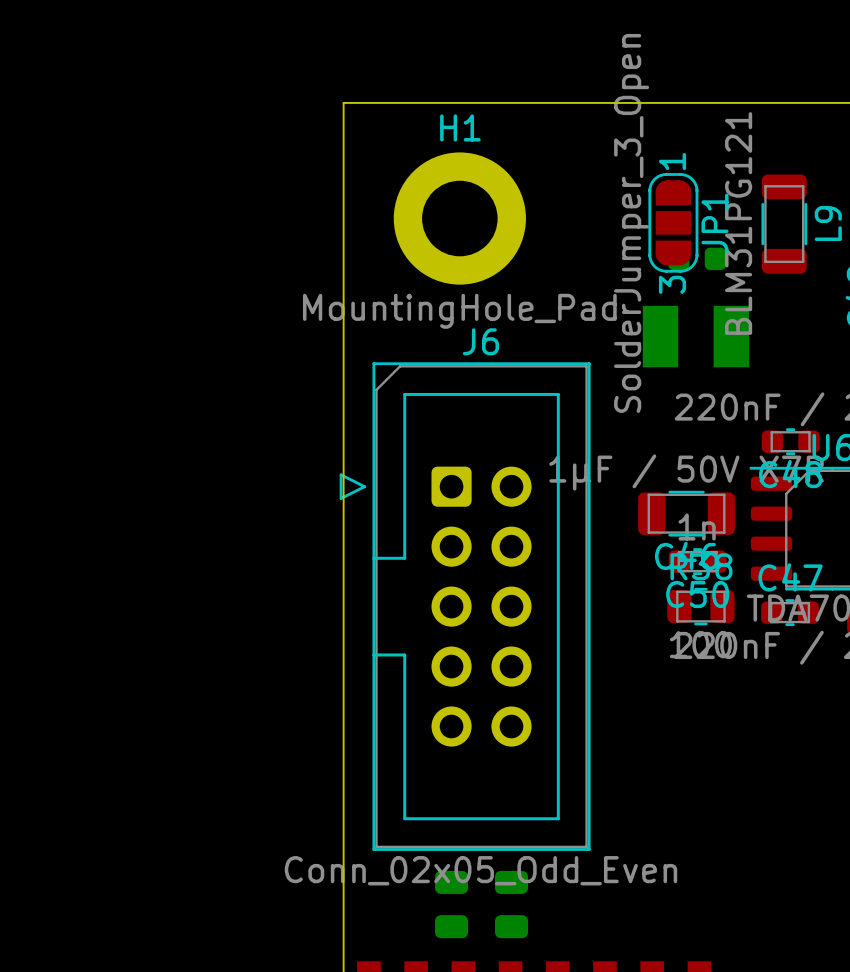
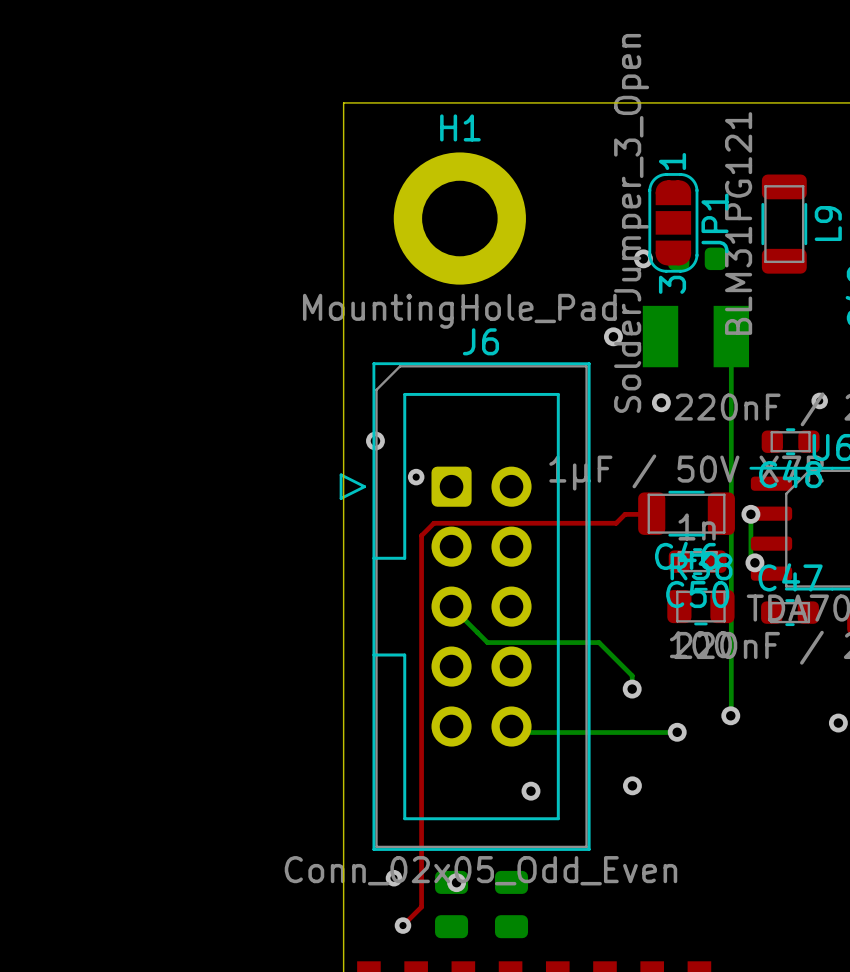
via: none -> (643, 258)
via: none -> (613, 336)
bottom track: none -> (732, 337) (731, 715)
via: none -> (819, 400)
via: none -> (661, 402)
via: none -> (375, 441)
via: none -> (416, 477)
top track: none -> (654, 514) (625, 514) (616, 523) (433, 523) (421, 535) (421, 906) (402, 925)
bottom track: none -> (750, 514) (750, 558) (754, 562)
via: none -> (750, 514)
via: none -> (754, 562)
bottom track: none -> (457, 612) (487, 642) (599, 642) (632, 675) (632, 689)
via: none -> (632, 689)
via: none -> (730, 715)
via: none -> (838, 723)
bottom track: none -> (517, 732) (676, 732)
via: none -> (677, 732)
via: none -> (632, 785)
via: none -> (530, 791)
via: none -> (393, 878)
via: none -> (456, 882)
via: none -> (402, 925)

